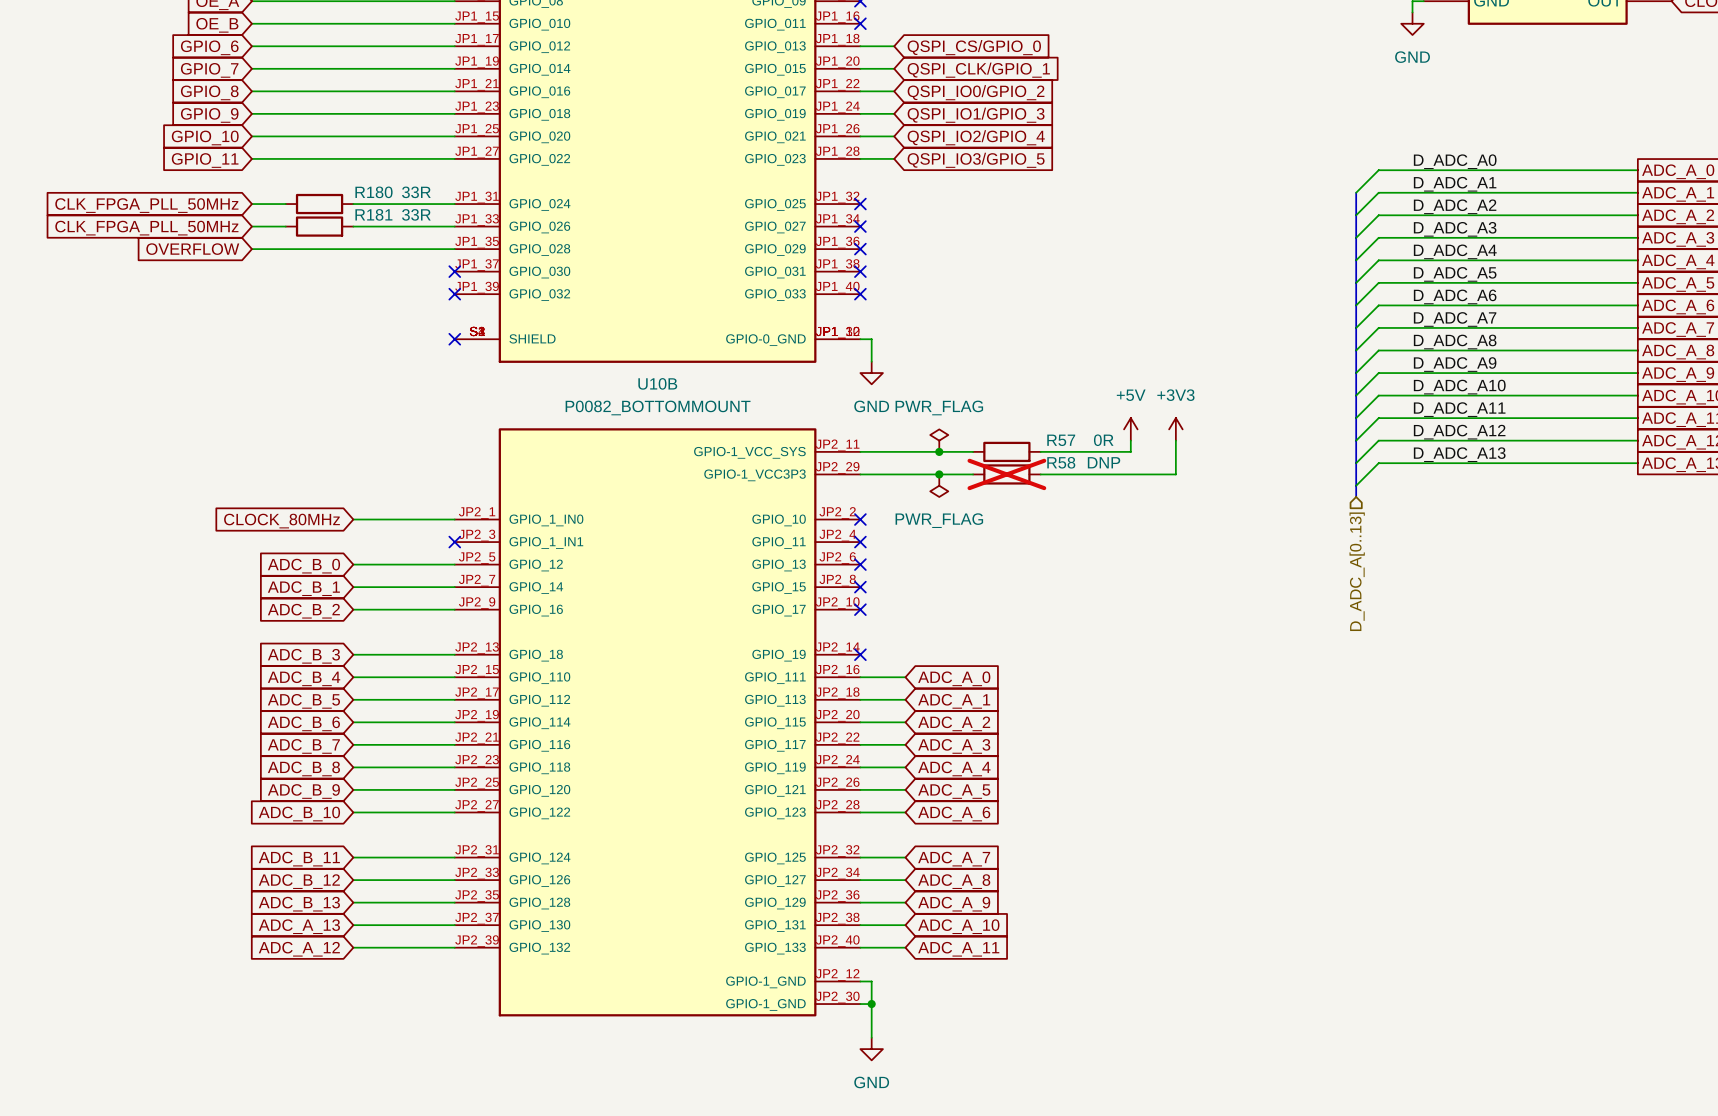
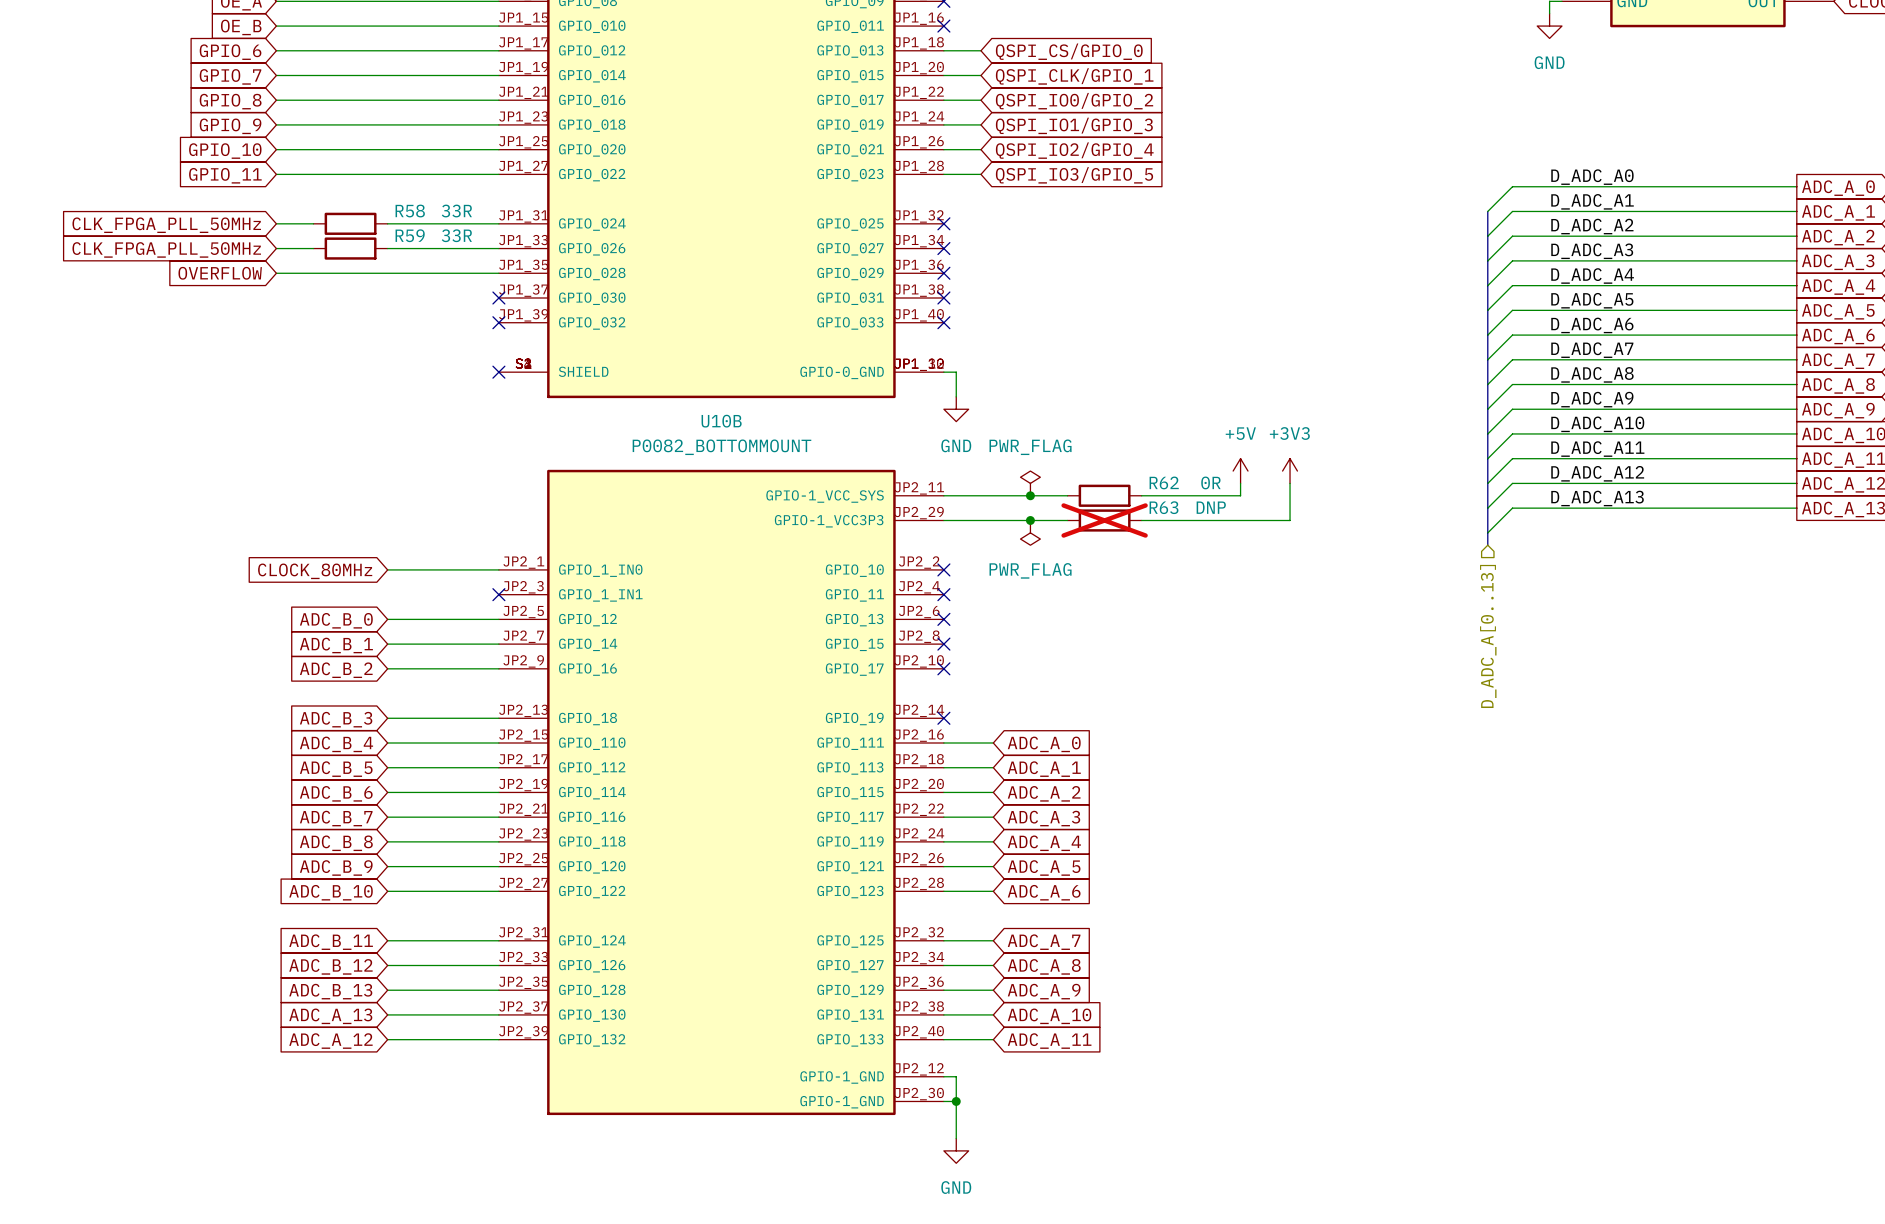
R180 name: R180 (373, 192) -> R58 (410, 211)
R181 name: R181 (373, 214) -> R59 (410, 235)
R57 name: R57 (1061, 440) -> R62 (1164, 482)
R58 name: R58 (1061, 462) -> R63 (1164, 507)

